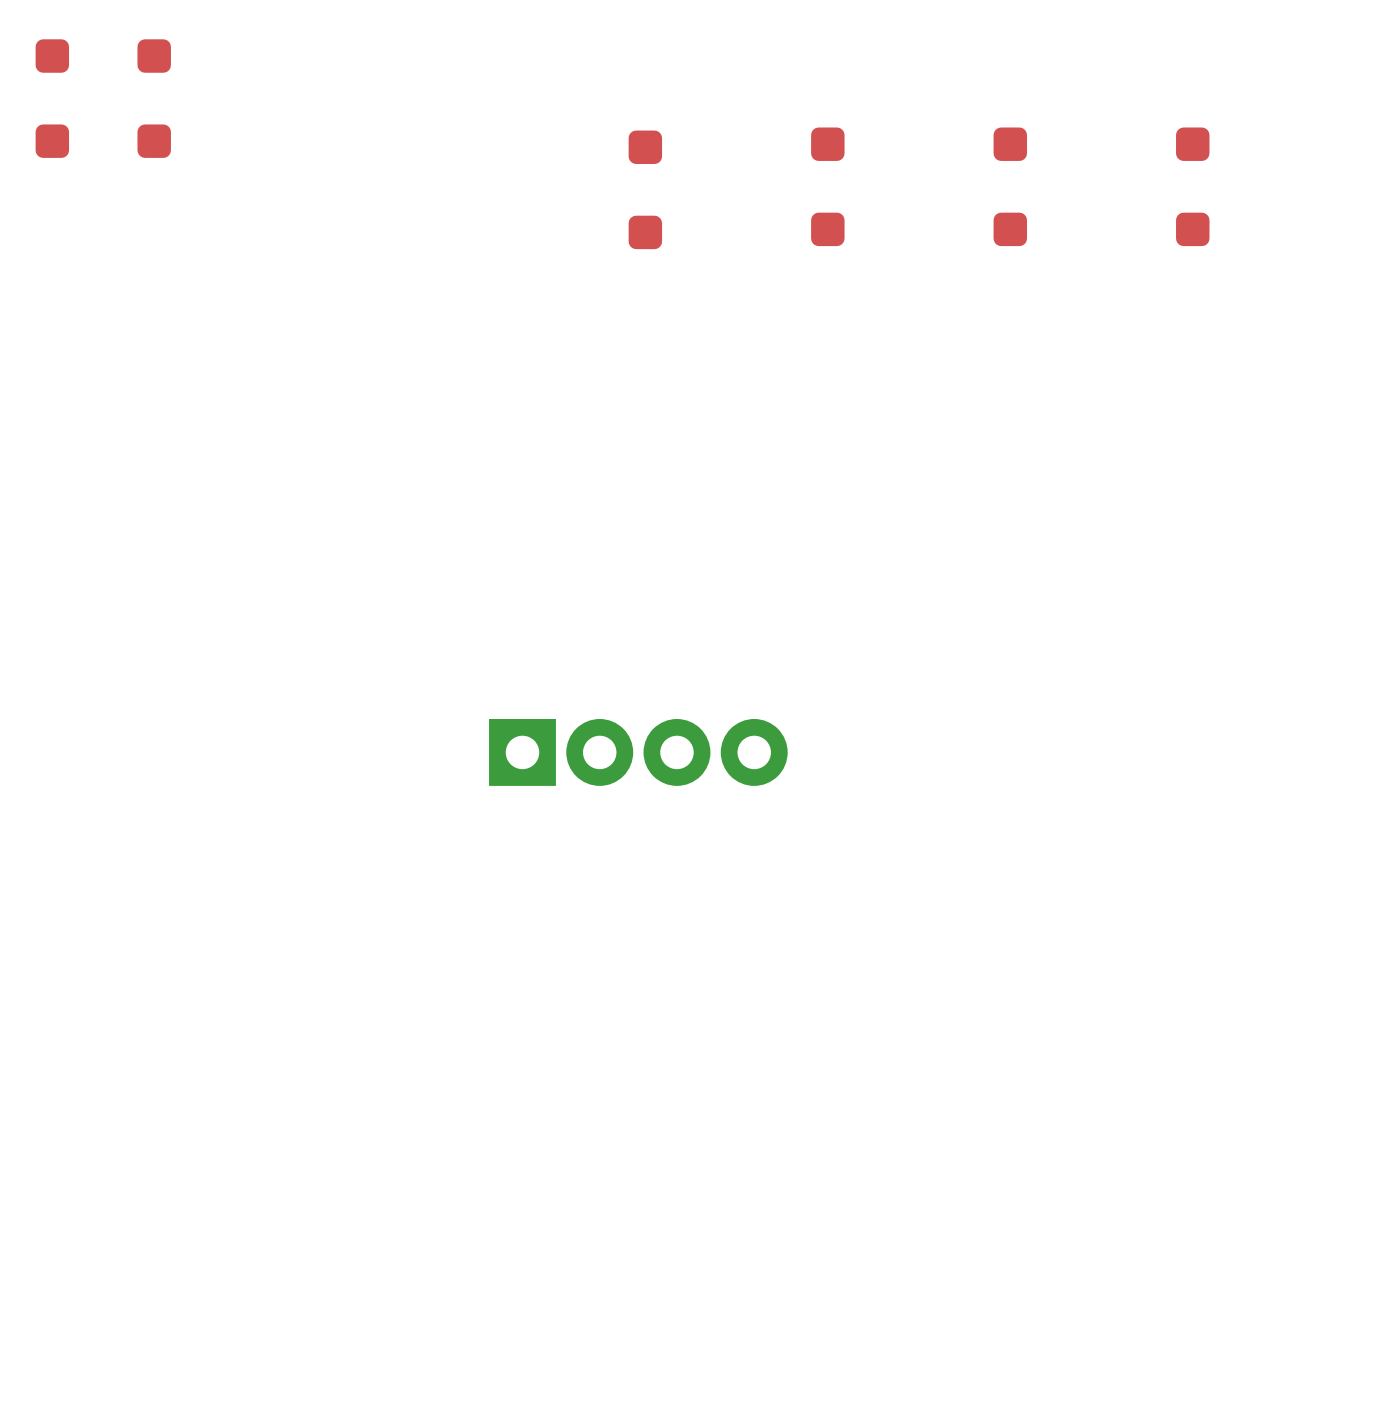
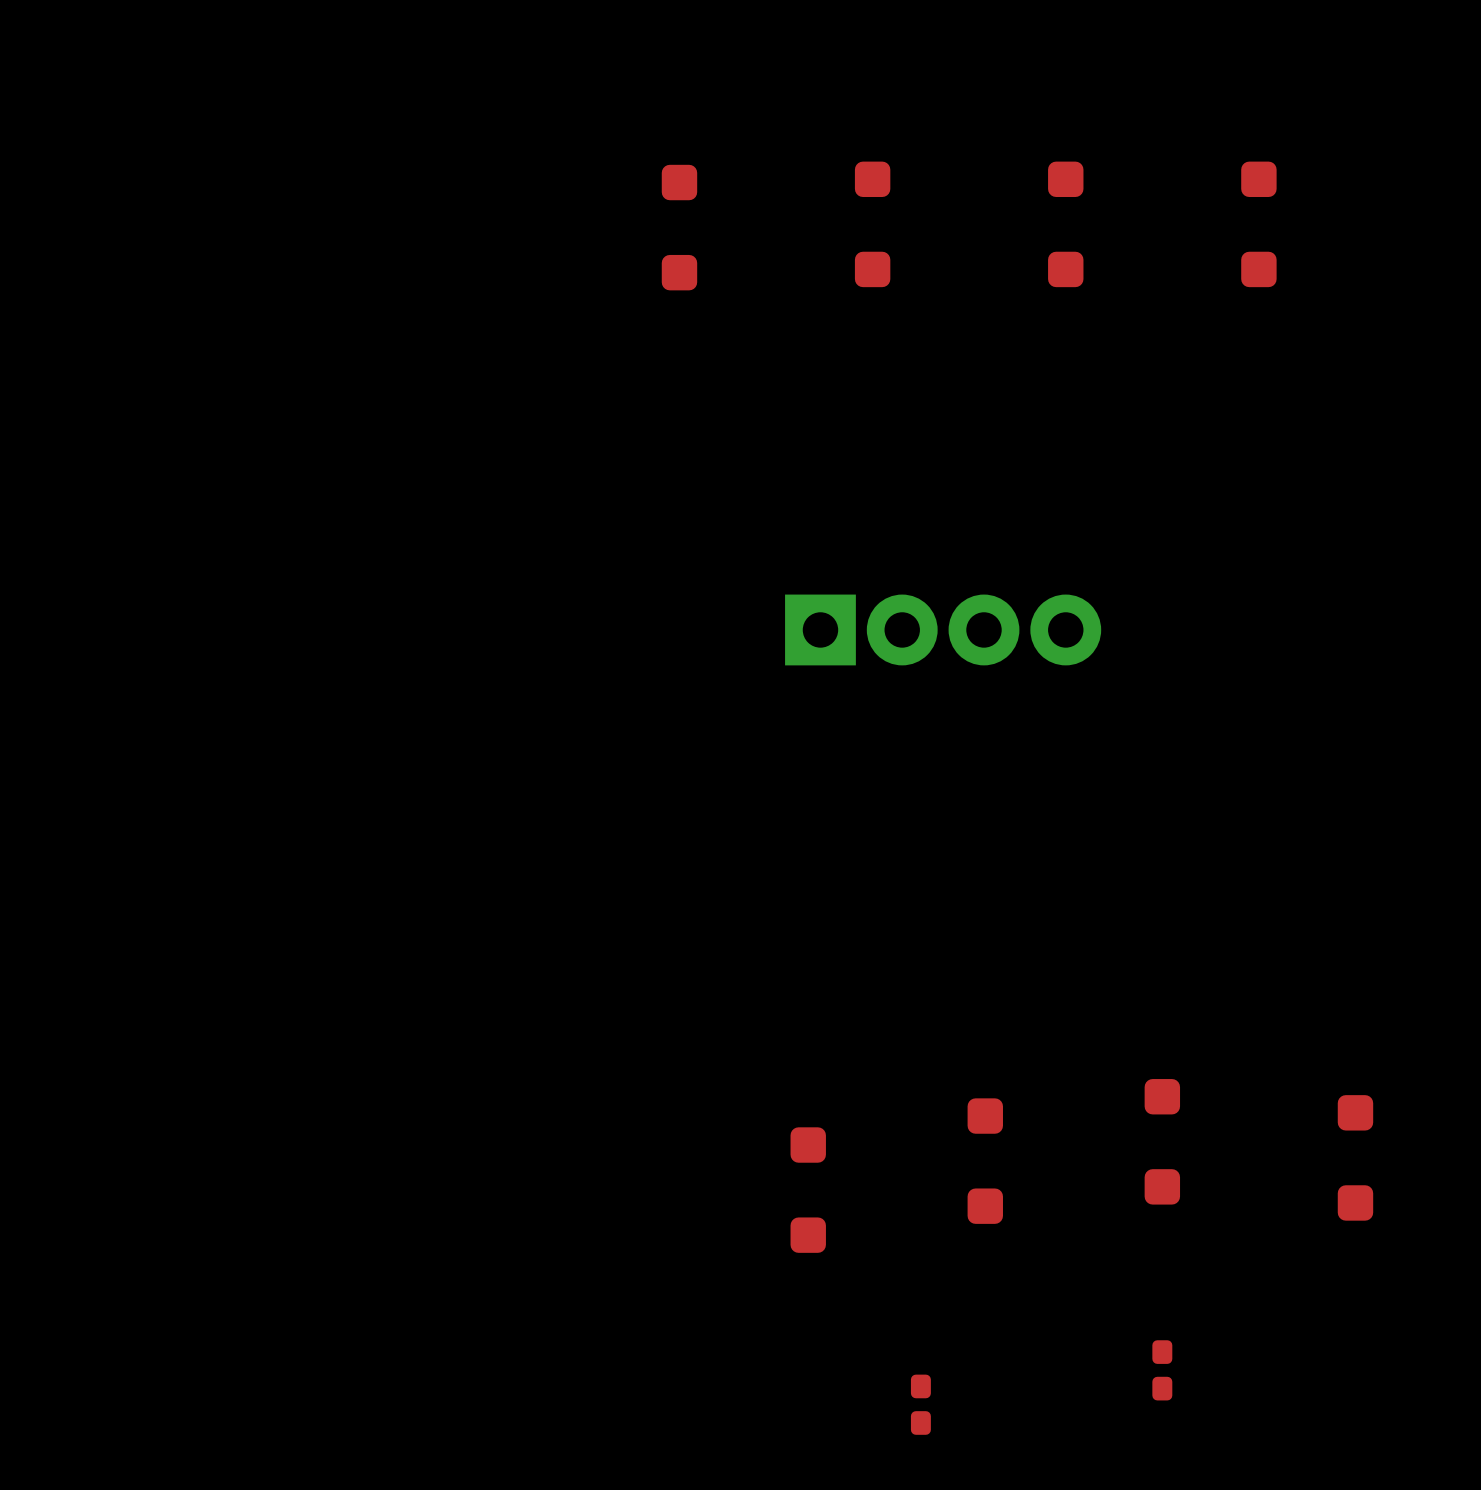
part: (52, 98) -> none
part: (154, 98) -> none
part position: (638, 752) -> (943, 629)
part: none -> (1162, 1141)
part: none -> (1355, 1157)
part: none -> (985, 1161)
part: none -> (808, 1190)
part: none -> (1162, 1370)
part: none -> (920, 1404)

